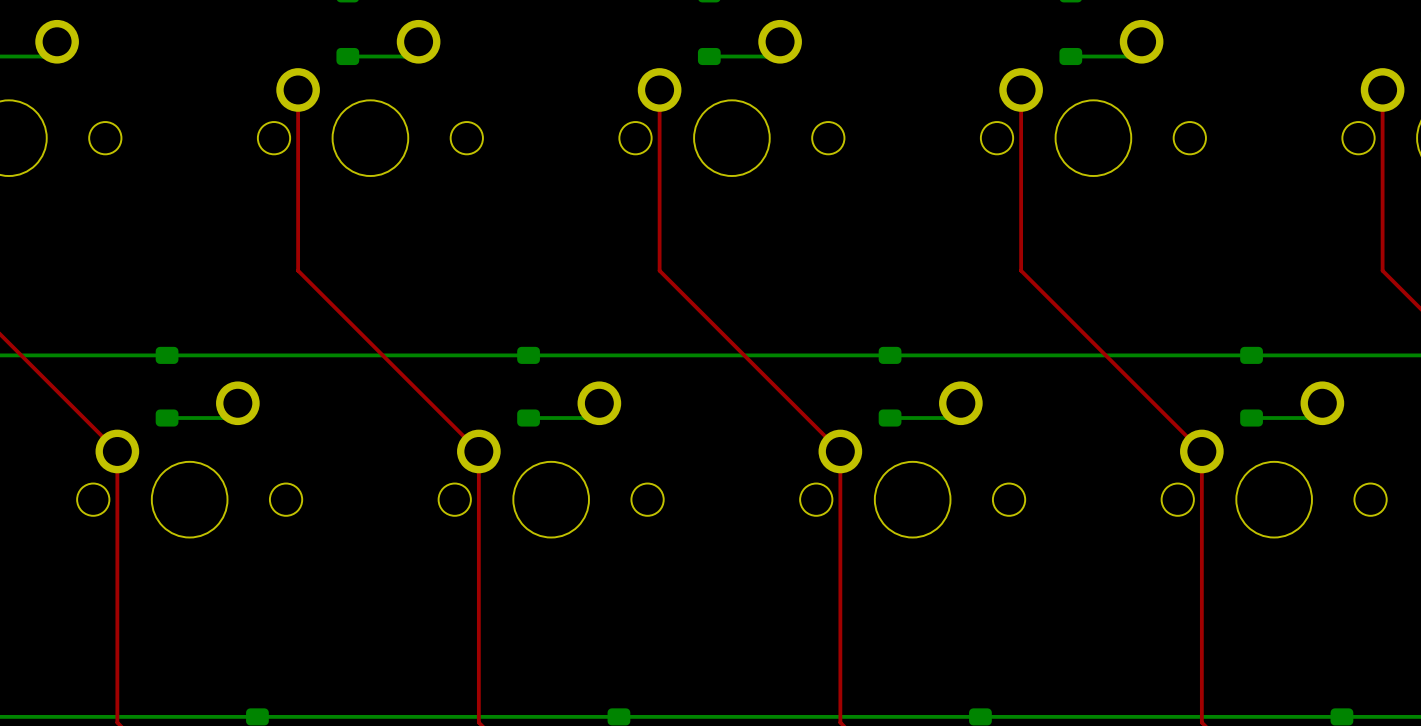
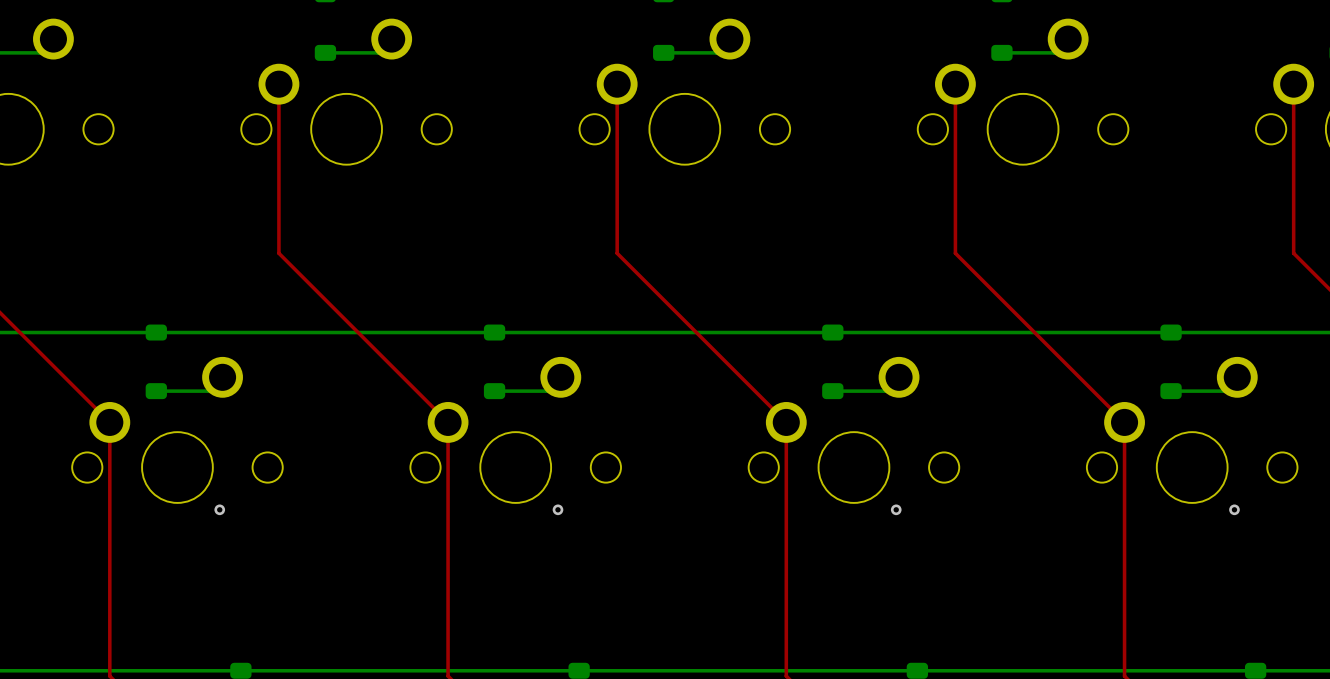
via: none -> (219, 509)
via: none -> (557, 509)
via: none -> (896, 509)
via: none -> (1234, 509)

